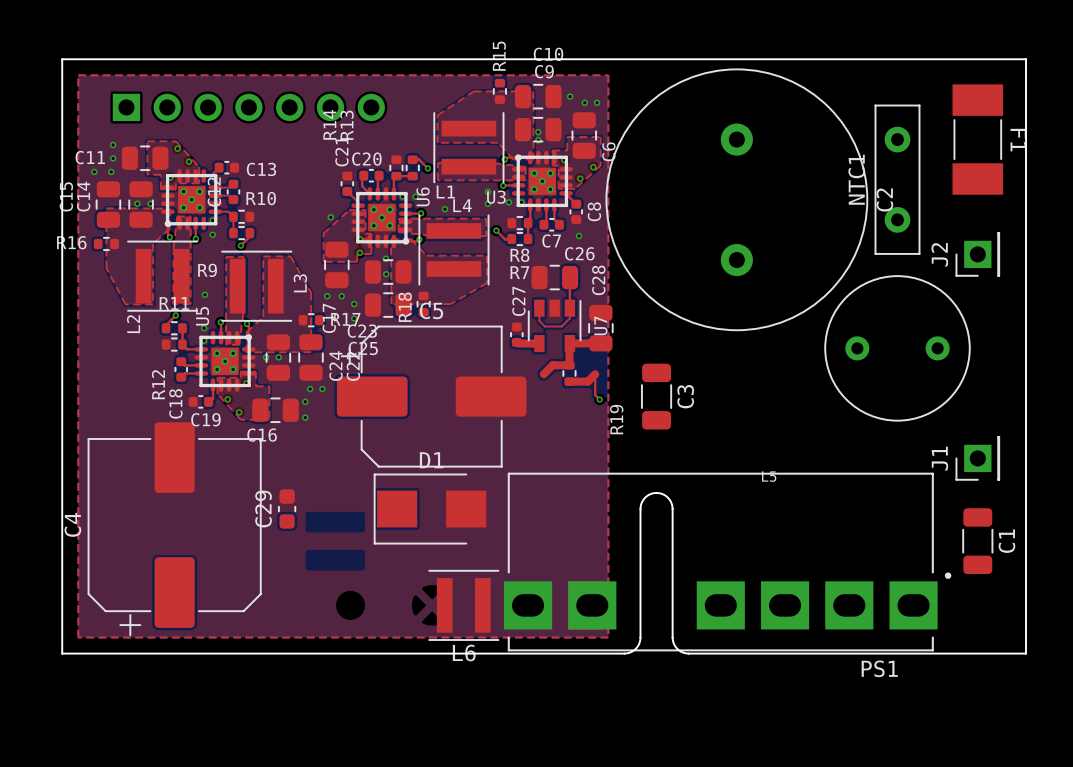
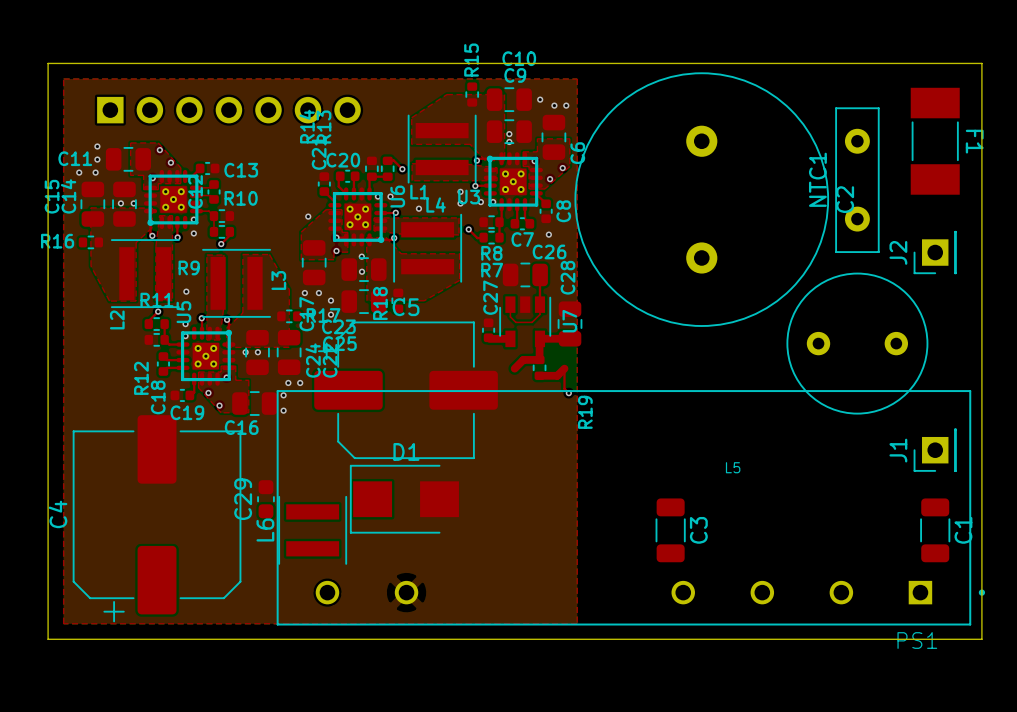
C3 position: (656, 396) -> (670, 530)
PS1 footprint: [503, 472, 952, 652] -> [276, 390, 986, 626]
L6 rotation: 0° (463, 605) -> 90° clockwise (312, 530)
L6 position: (463, 605) -> (312, 530)
board edge: (624, 653) (634, 650) (640, 639) (641, 504) (646, 496) (656, 492) (666, 496) (672, 504) (672, 639) (678, 650) (688, 653) -> (592, 639) (655, 639)
PS1 name position: PS1 (879, 668) -> PS1 (917, 640)

